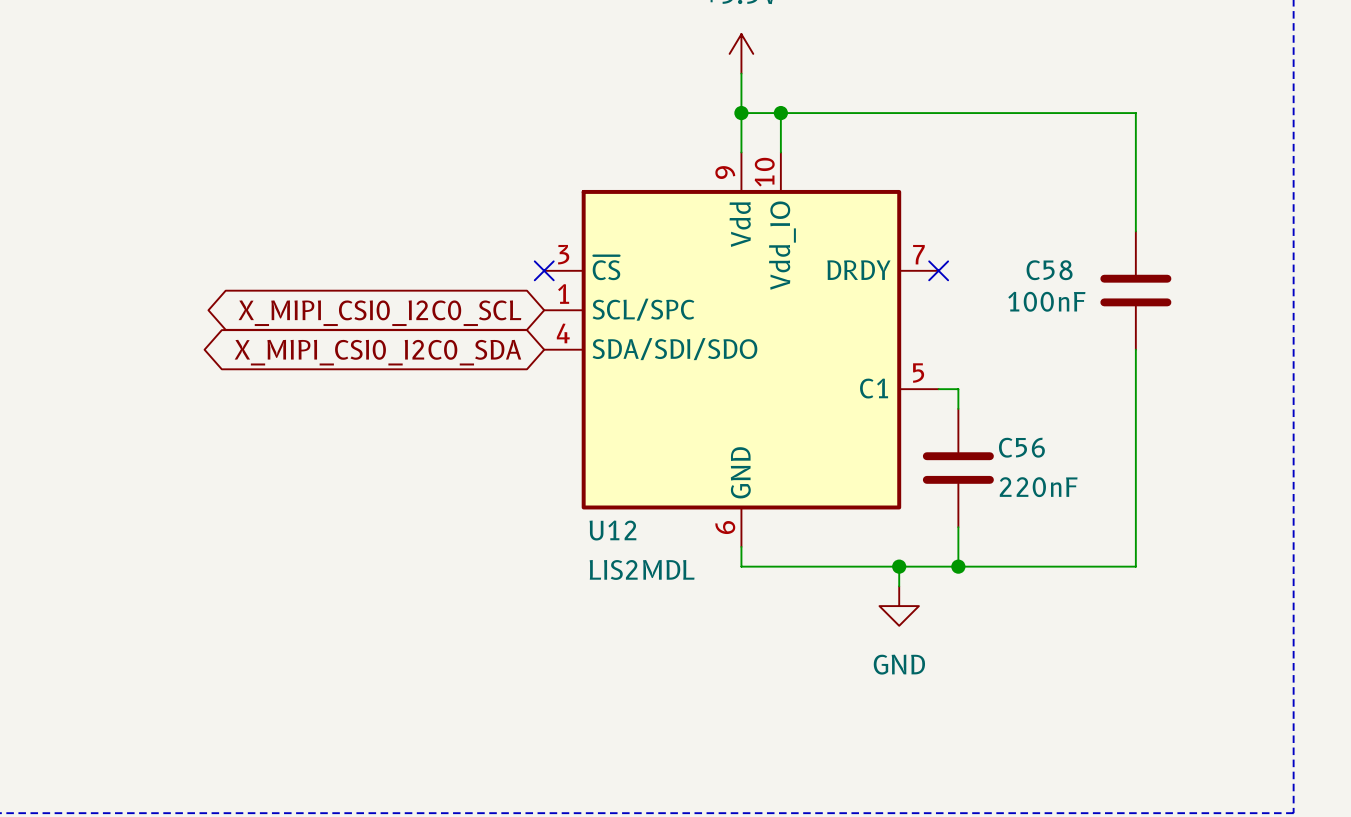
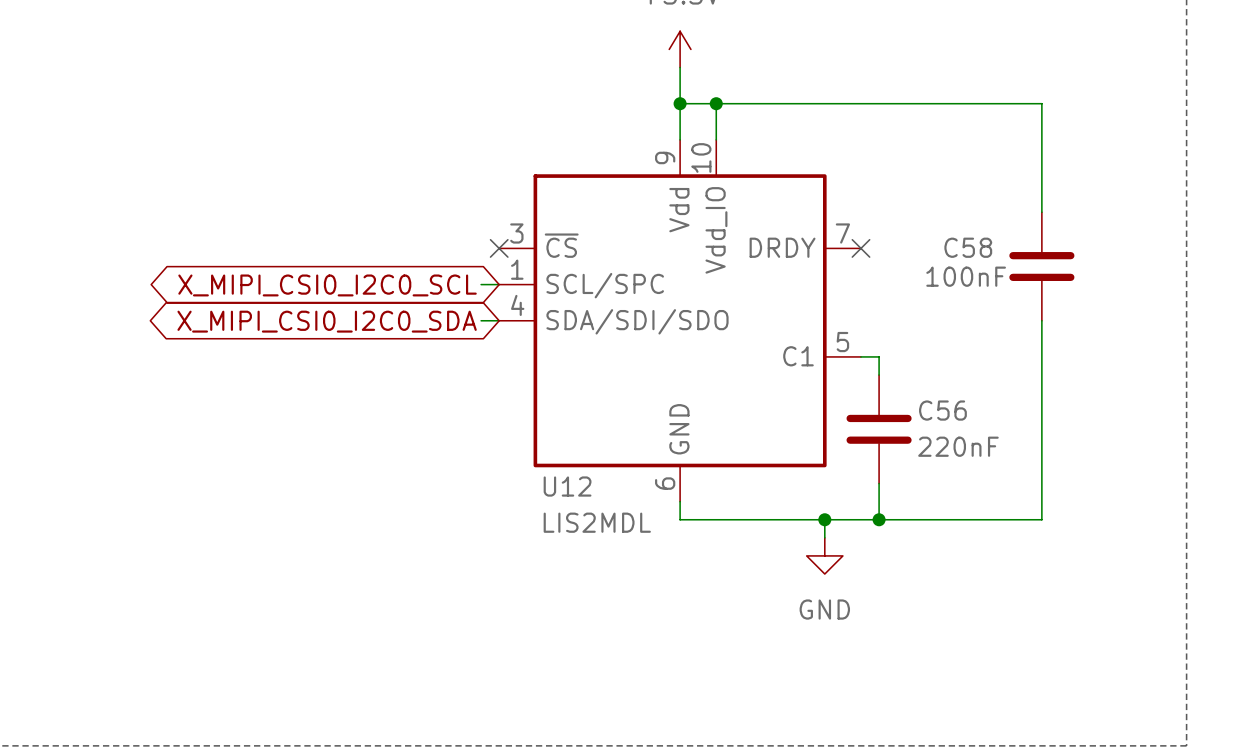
wire: none -> (481, 284) (499, 284)
wire: none -> (481, 320) (499, 320)

